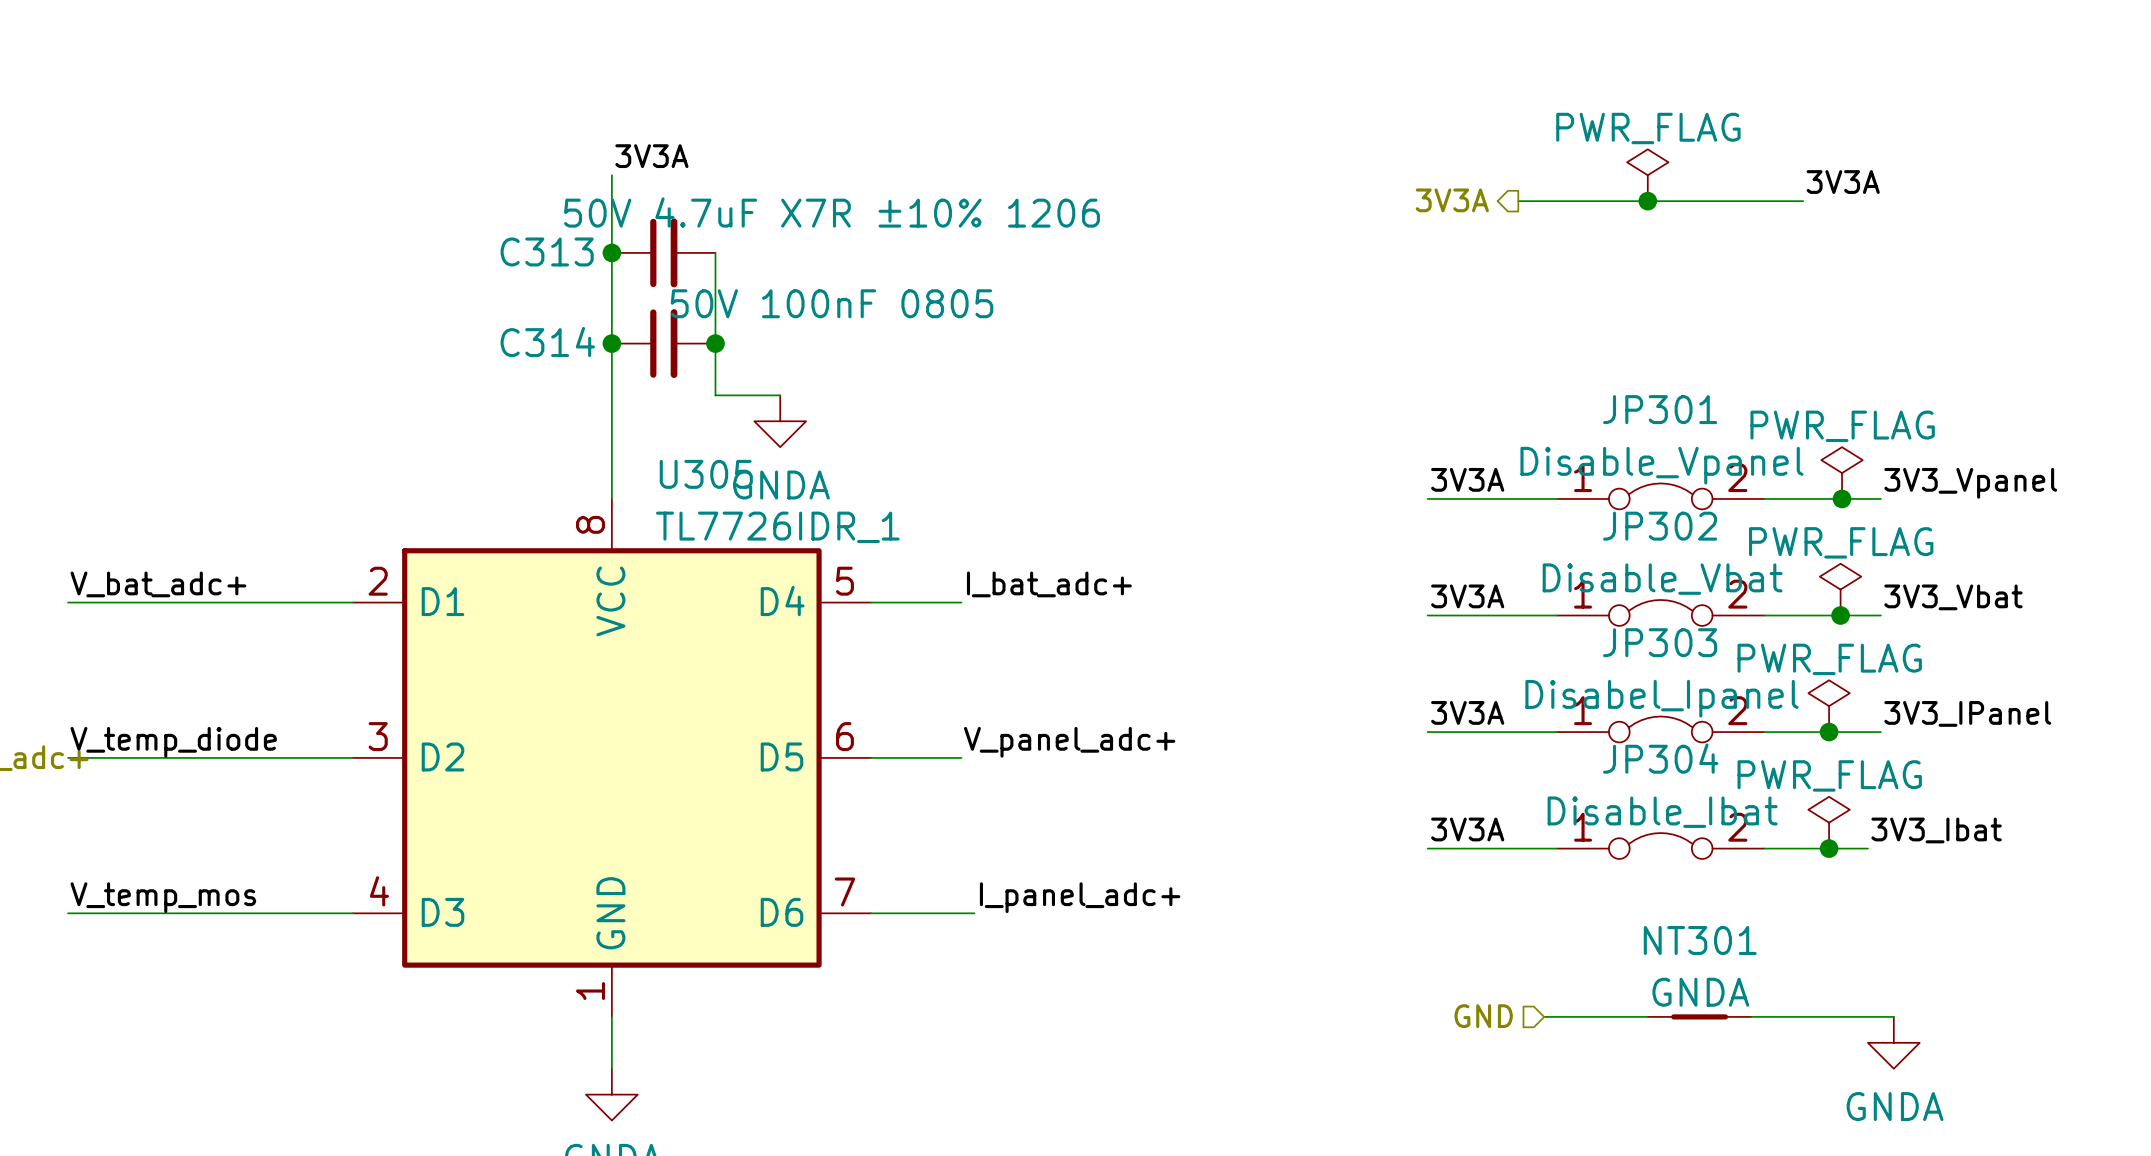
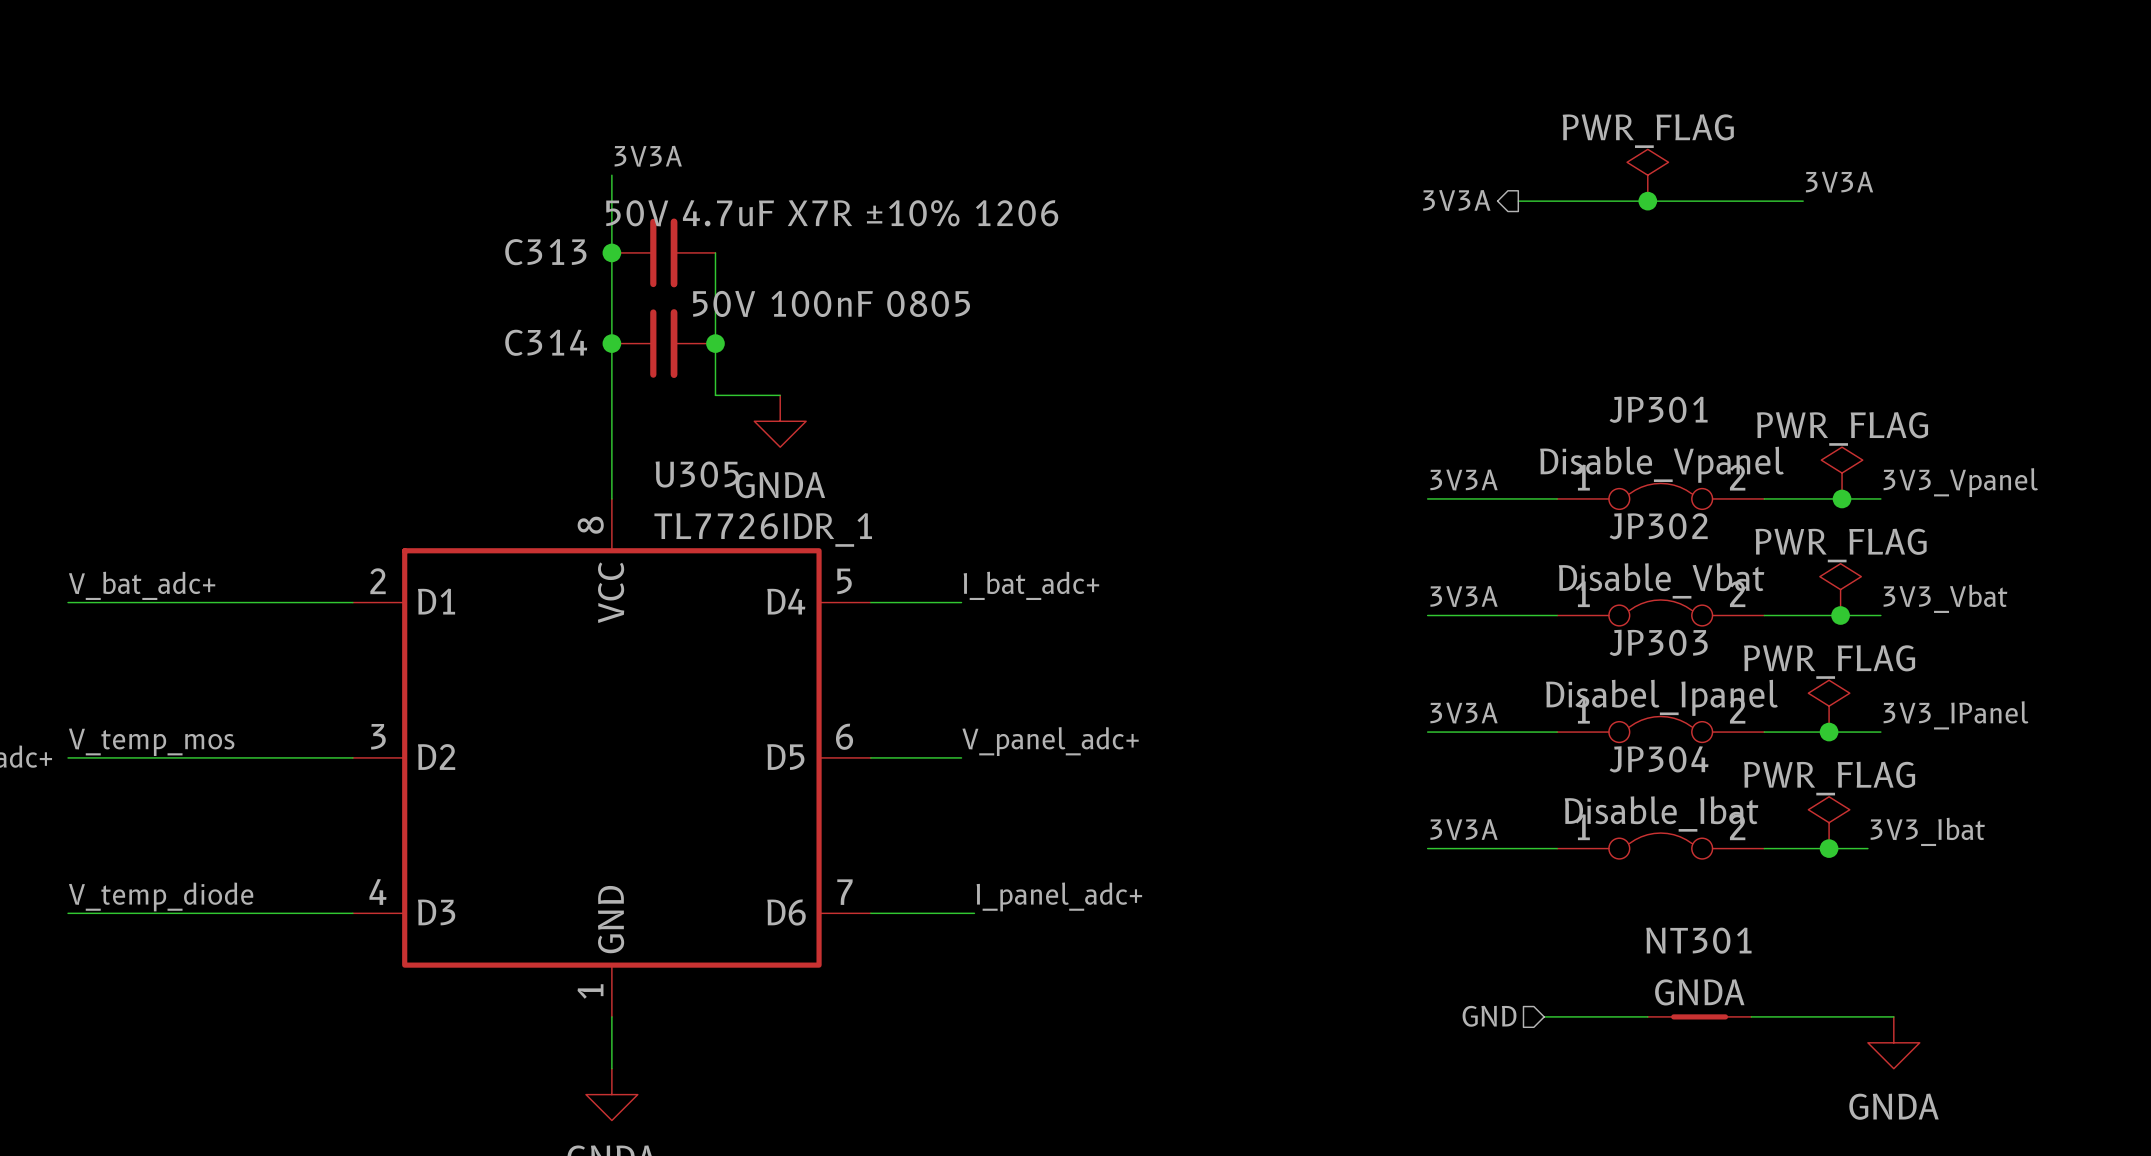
label: V_temp_diode (173, 742) -> V_temp_mos (151, 742)
label: V_temp_mos (163, 897) -> V_temp_diode (161, 896)

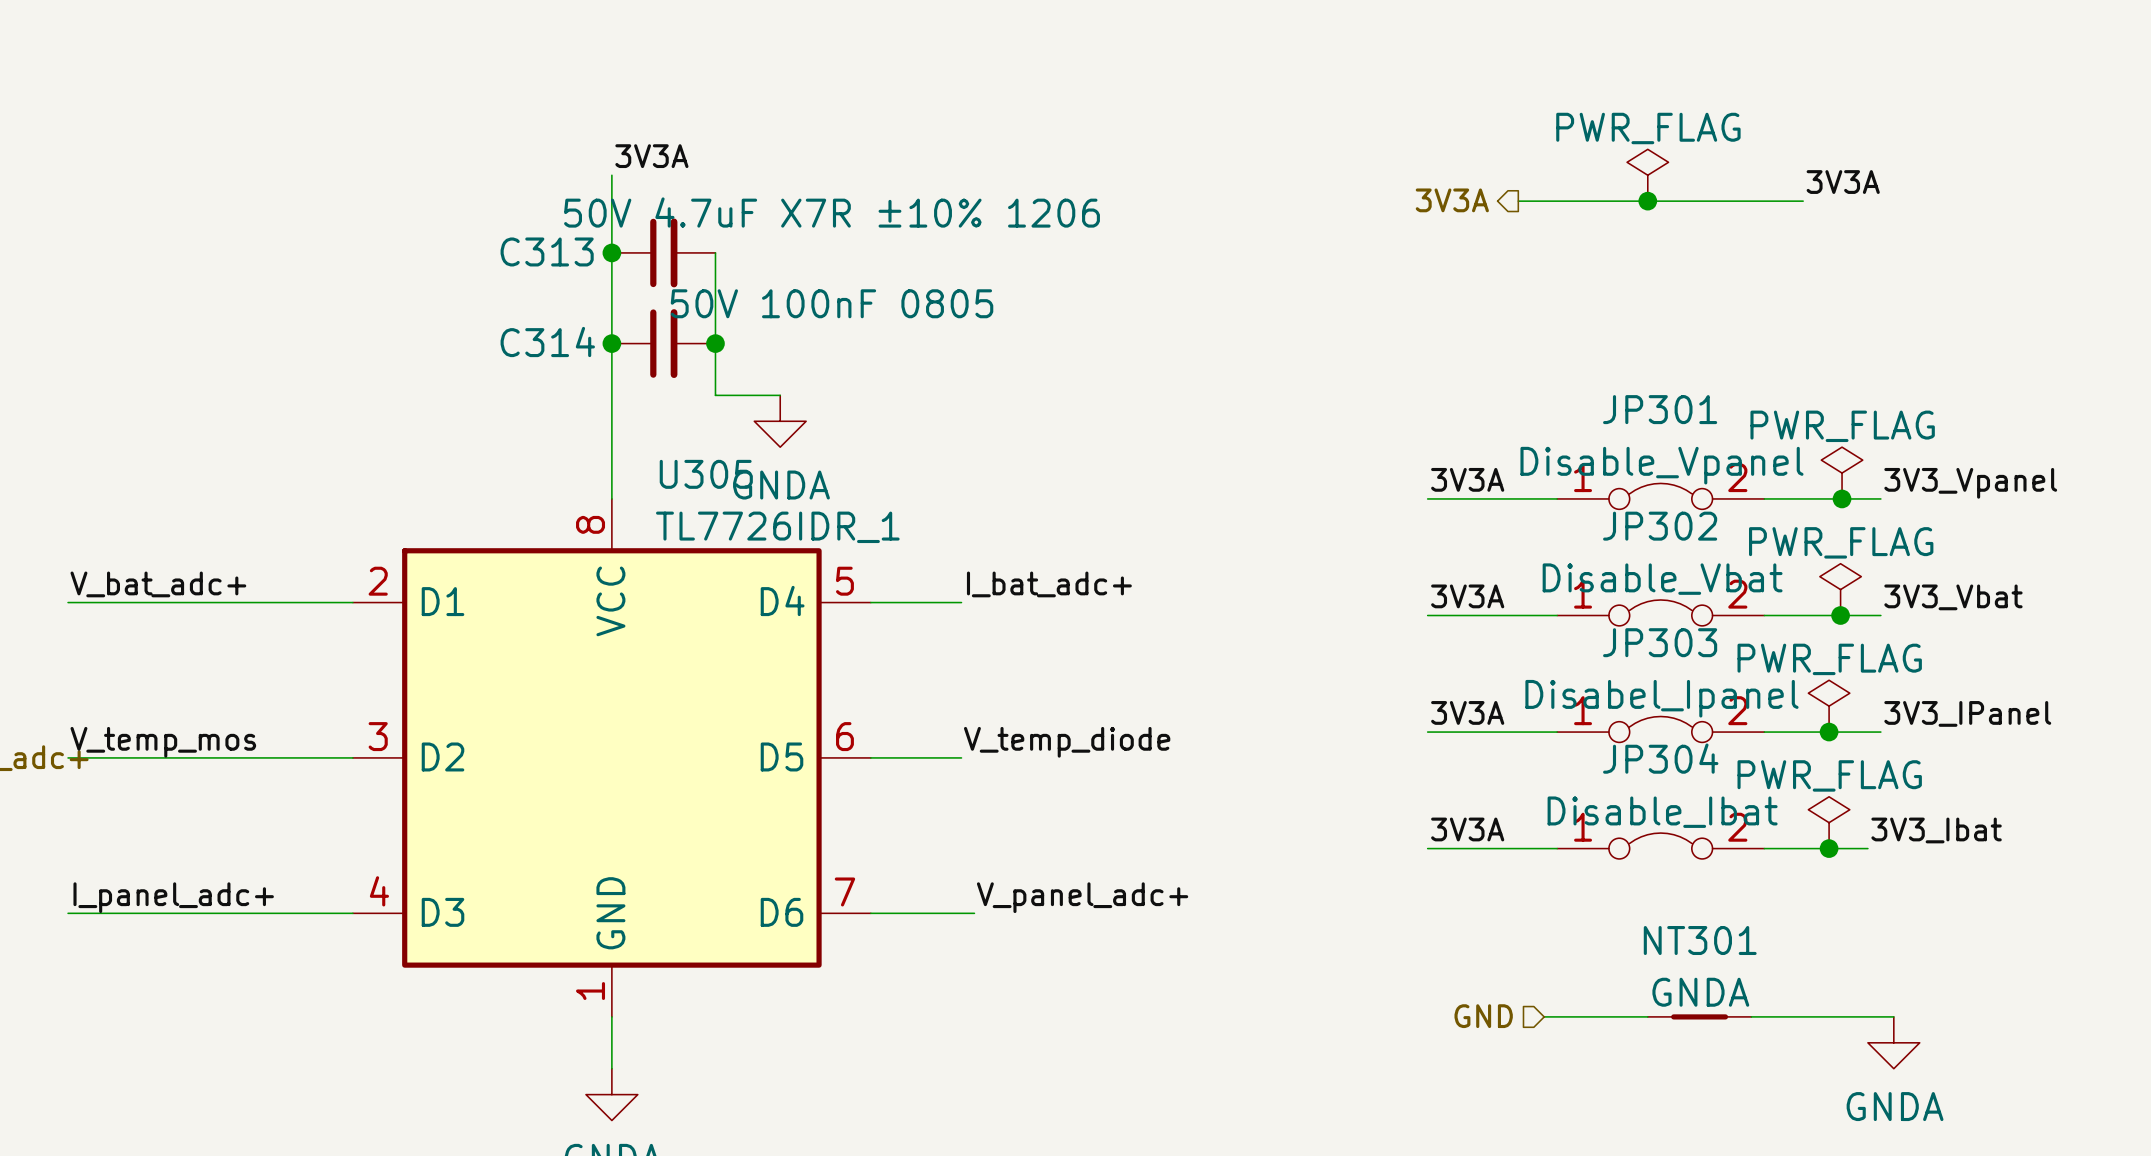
label: V_panel_adc+ (1050, 741) -> V_temp_diode (1067, 742)
label: V_temp_diode (161, 896) -> I_panel_adc+ (173, 897)
label: I_panel_adc+ (1059, 896) -> V_panel_adc+ (1082, 897)

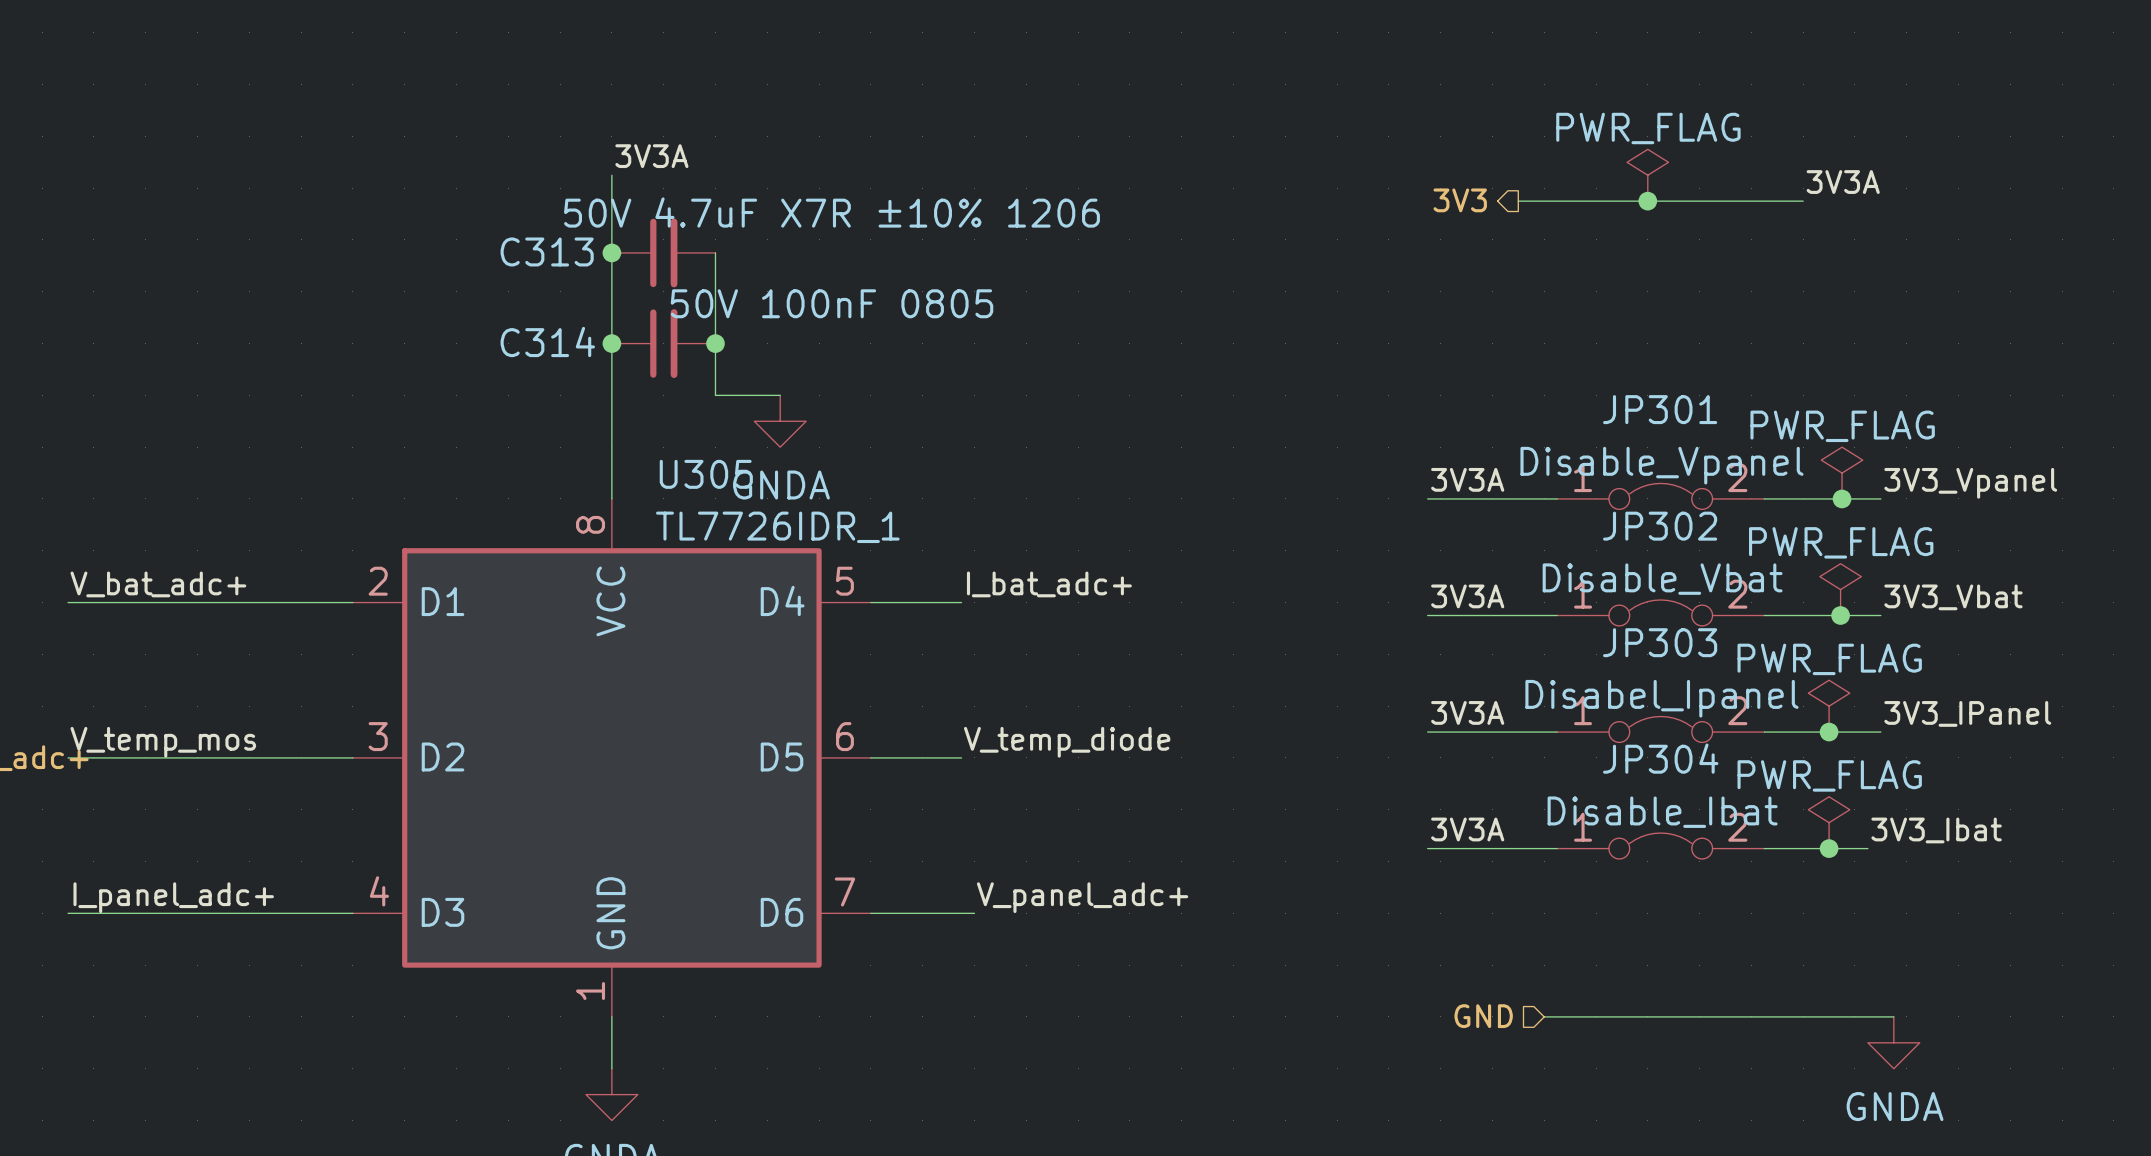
hierarchical label: 3V3A (1452, 200) -> 3V3 (1460, 200)
NT301: GNDA (1699, 1016) -> none

